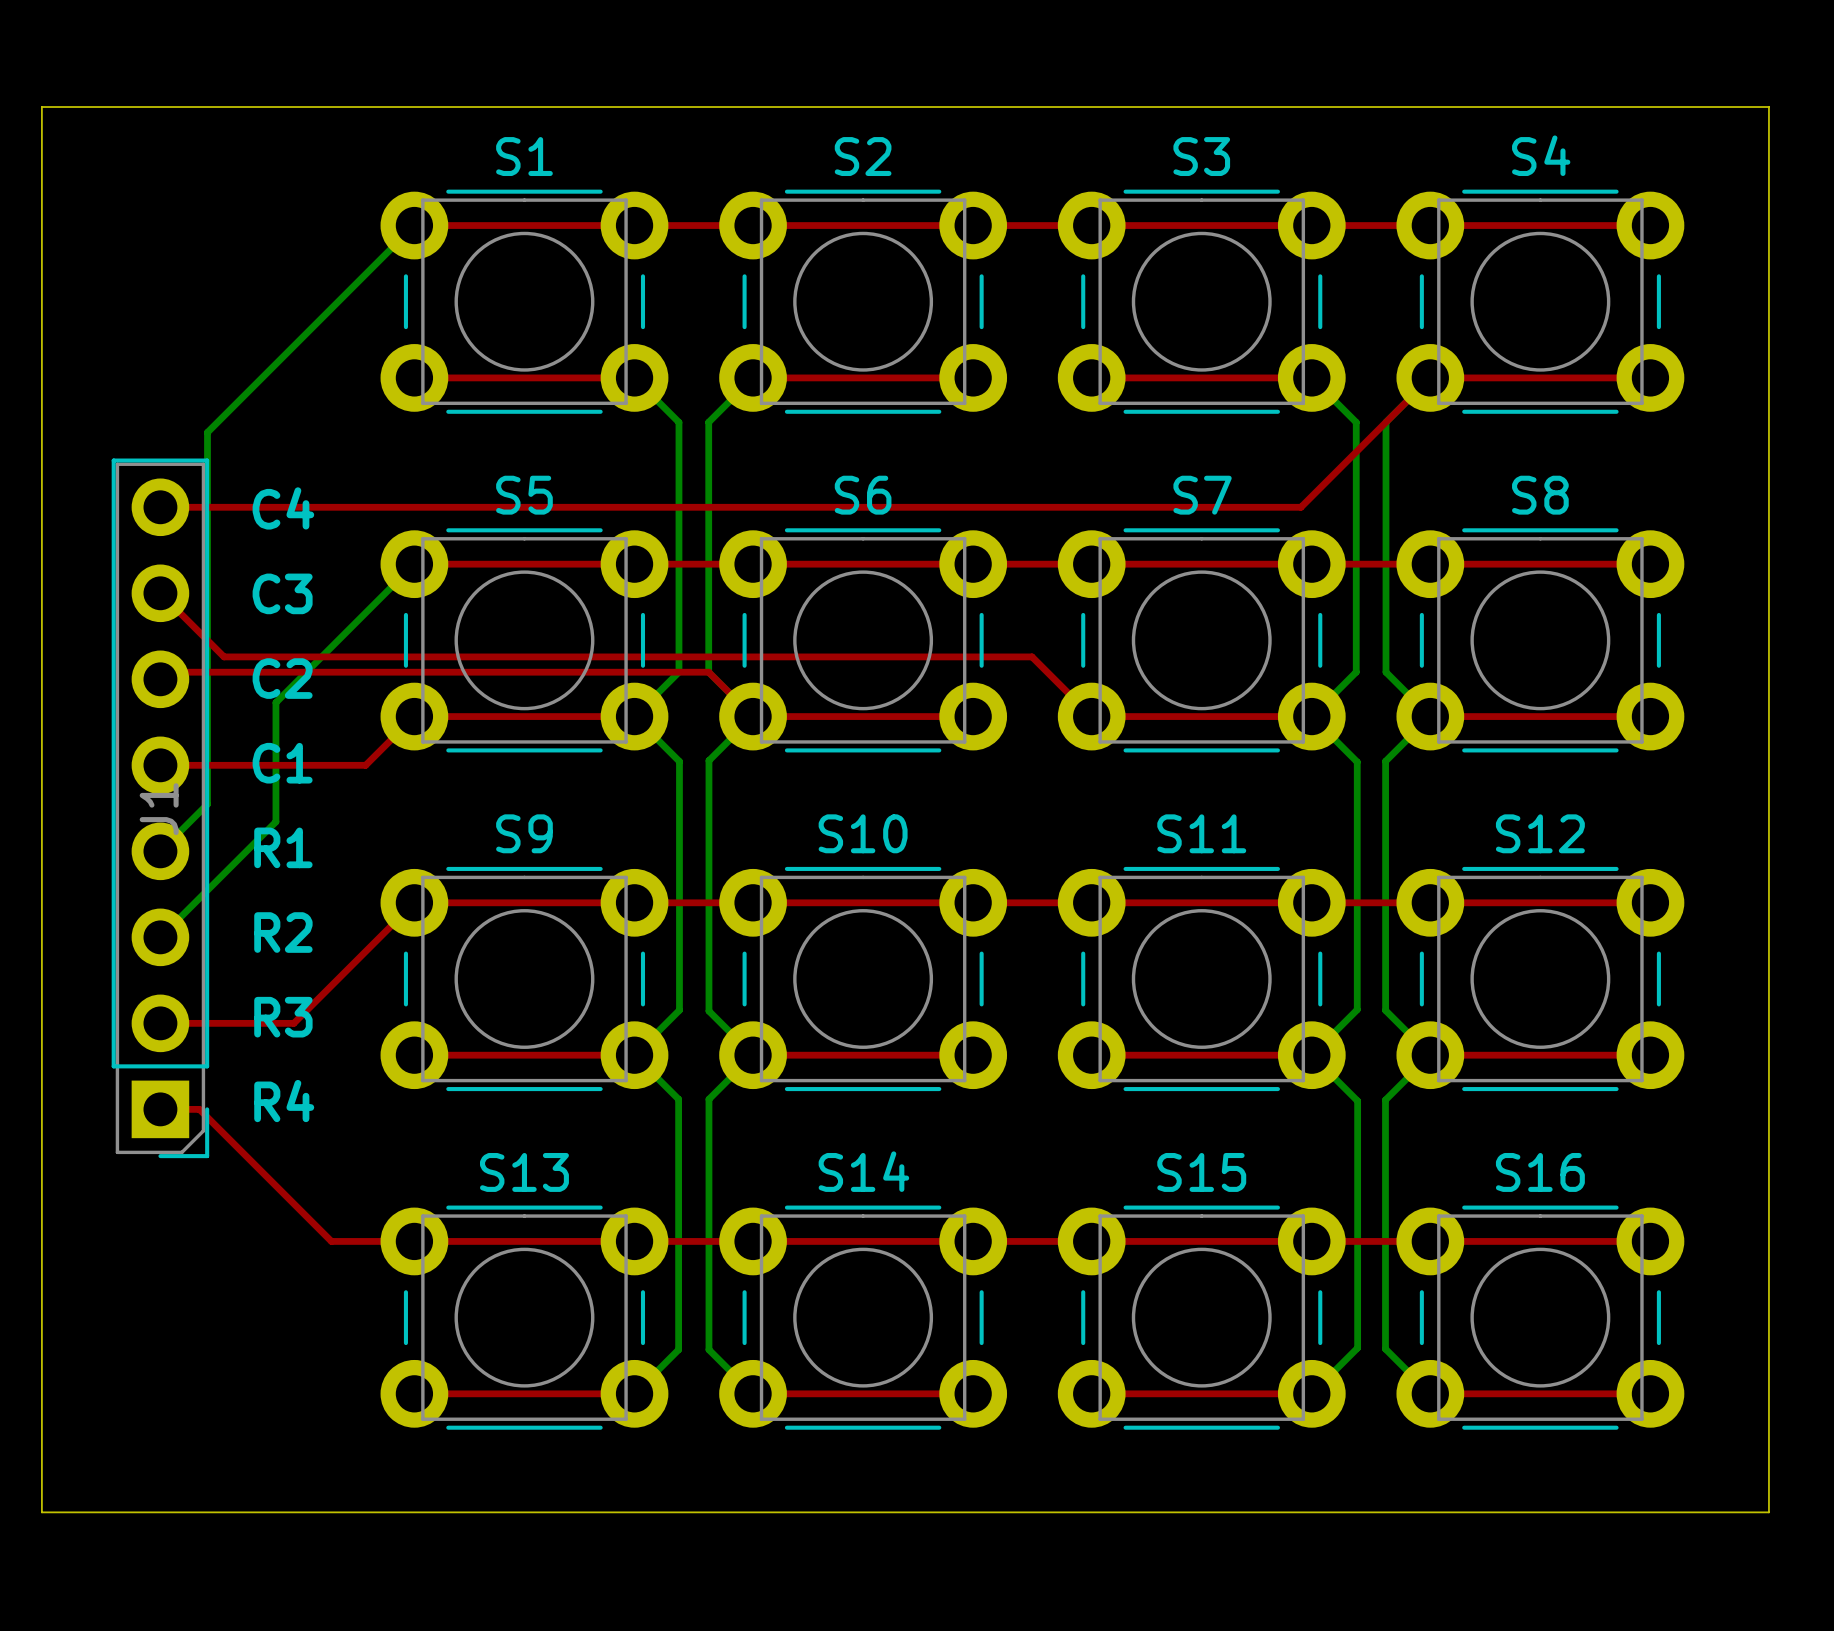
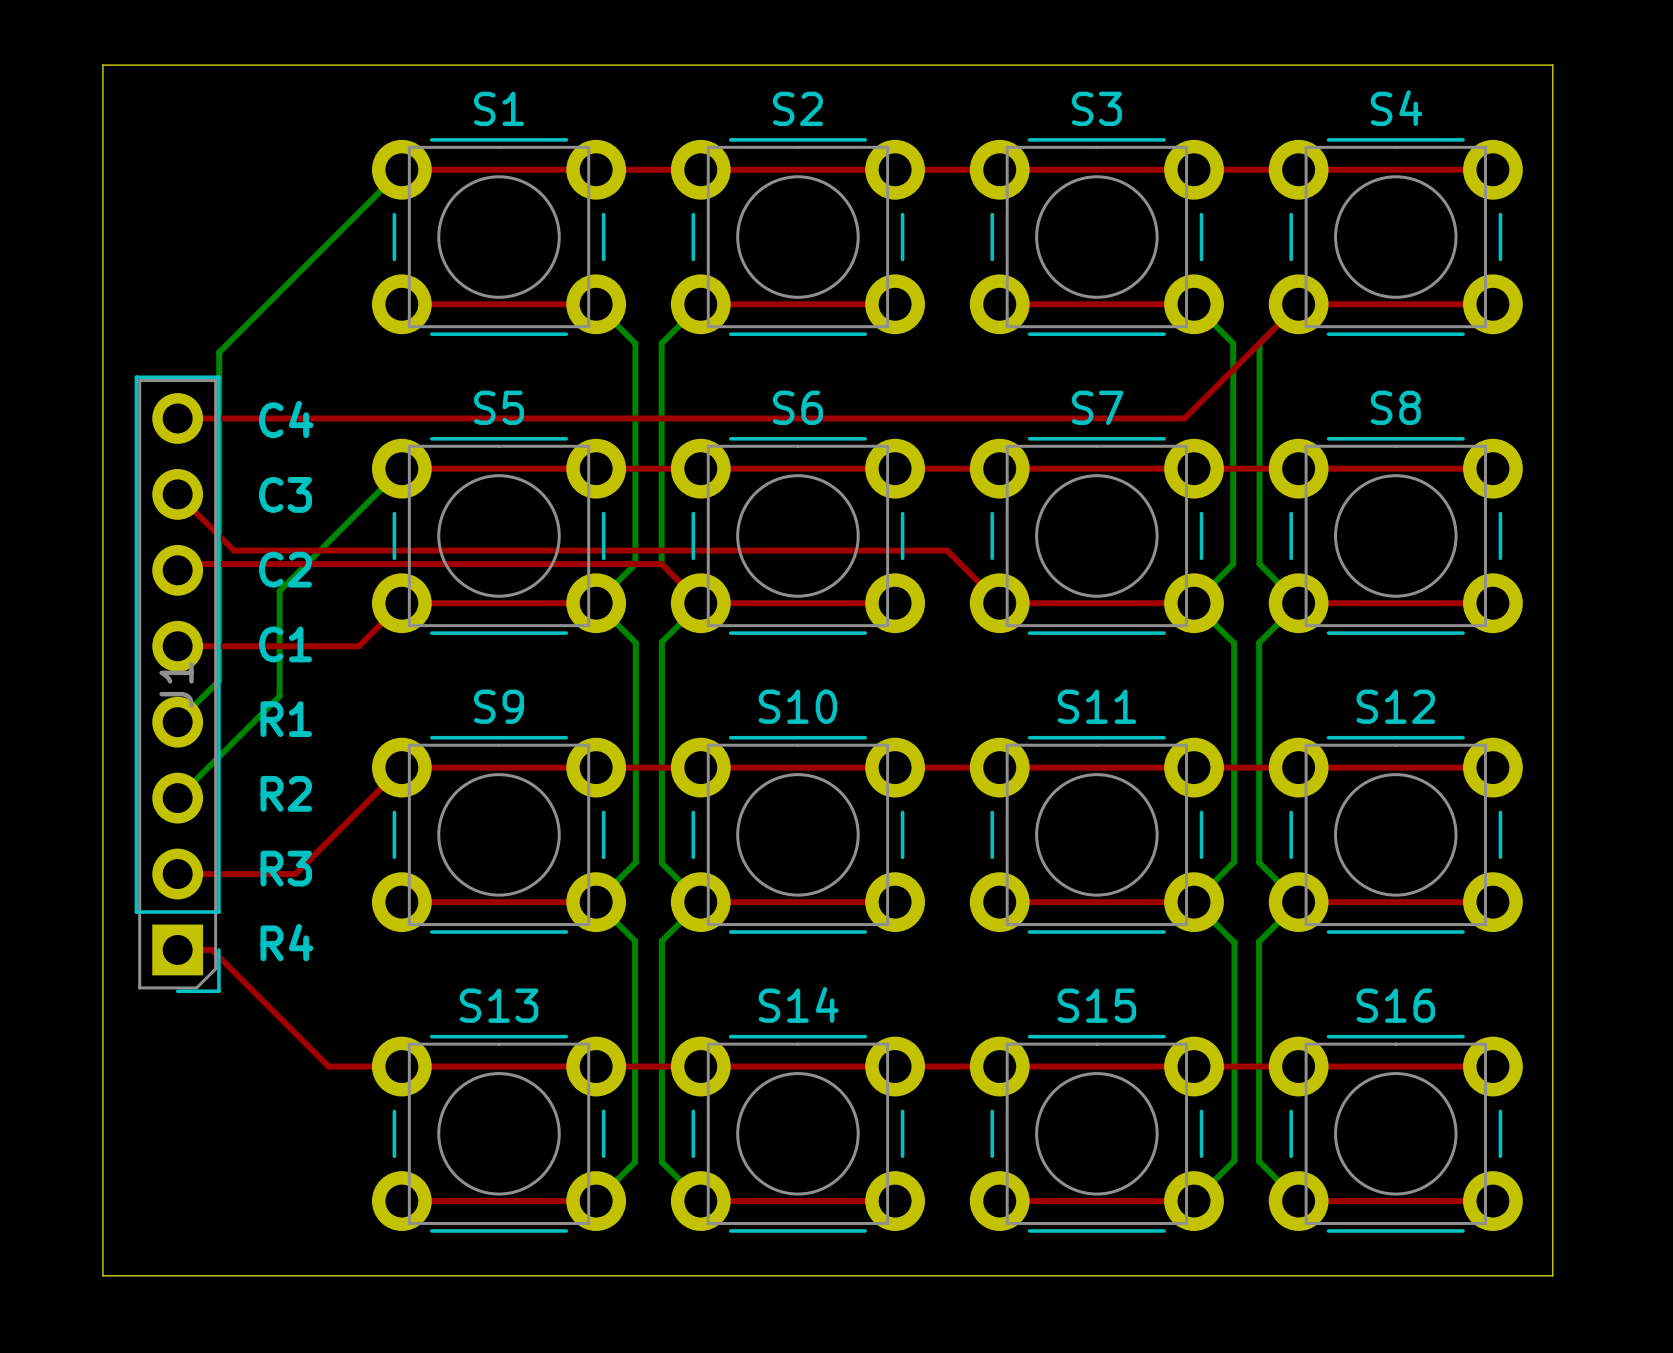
board edge: (75, 107) (41, 107) (41, 1512) (1768, 1512) (1768, 107) (1718, 107) -> (102, 65) (102, 1275) (1552, 1275) (1552, 65)

